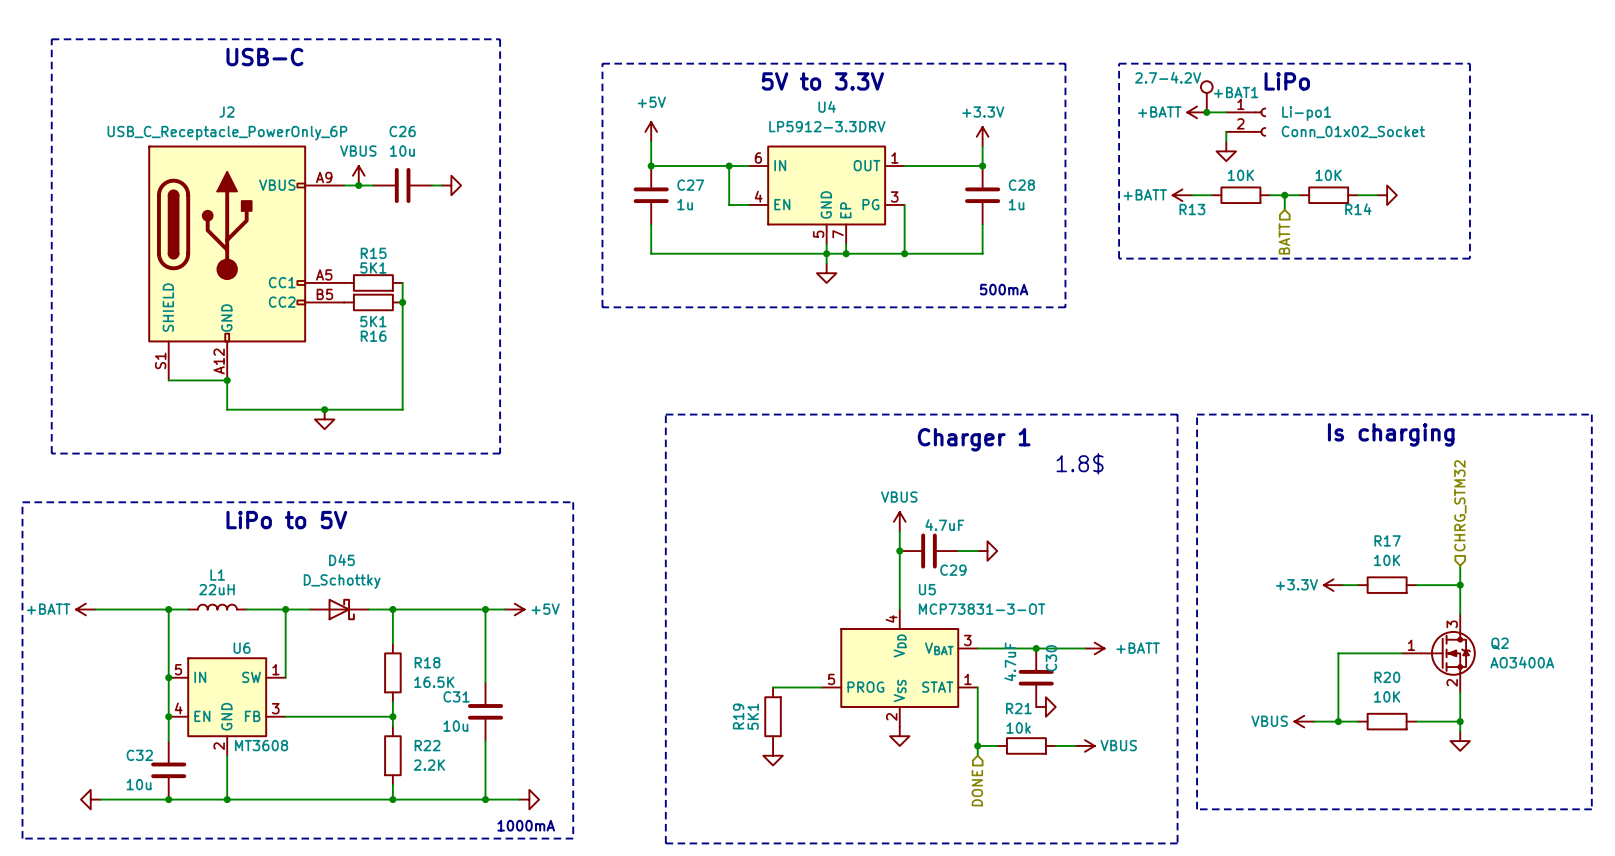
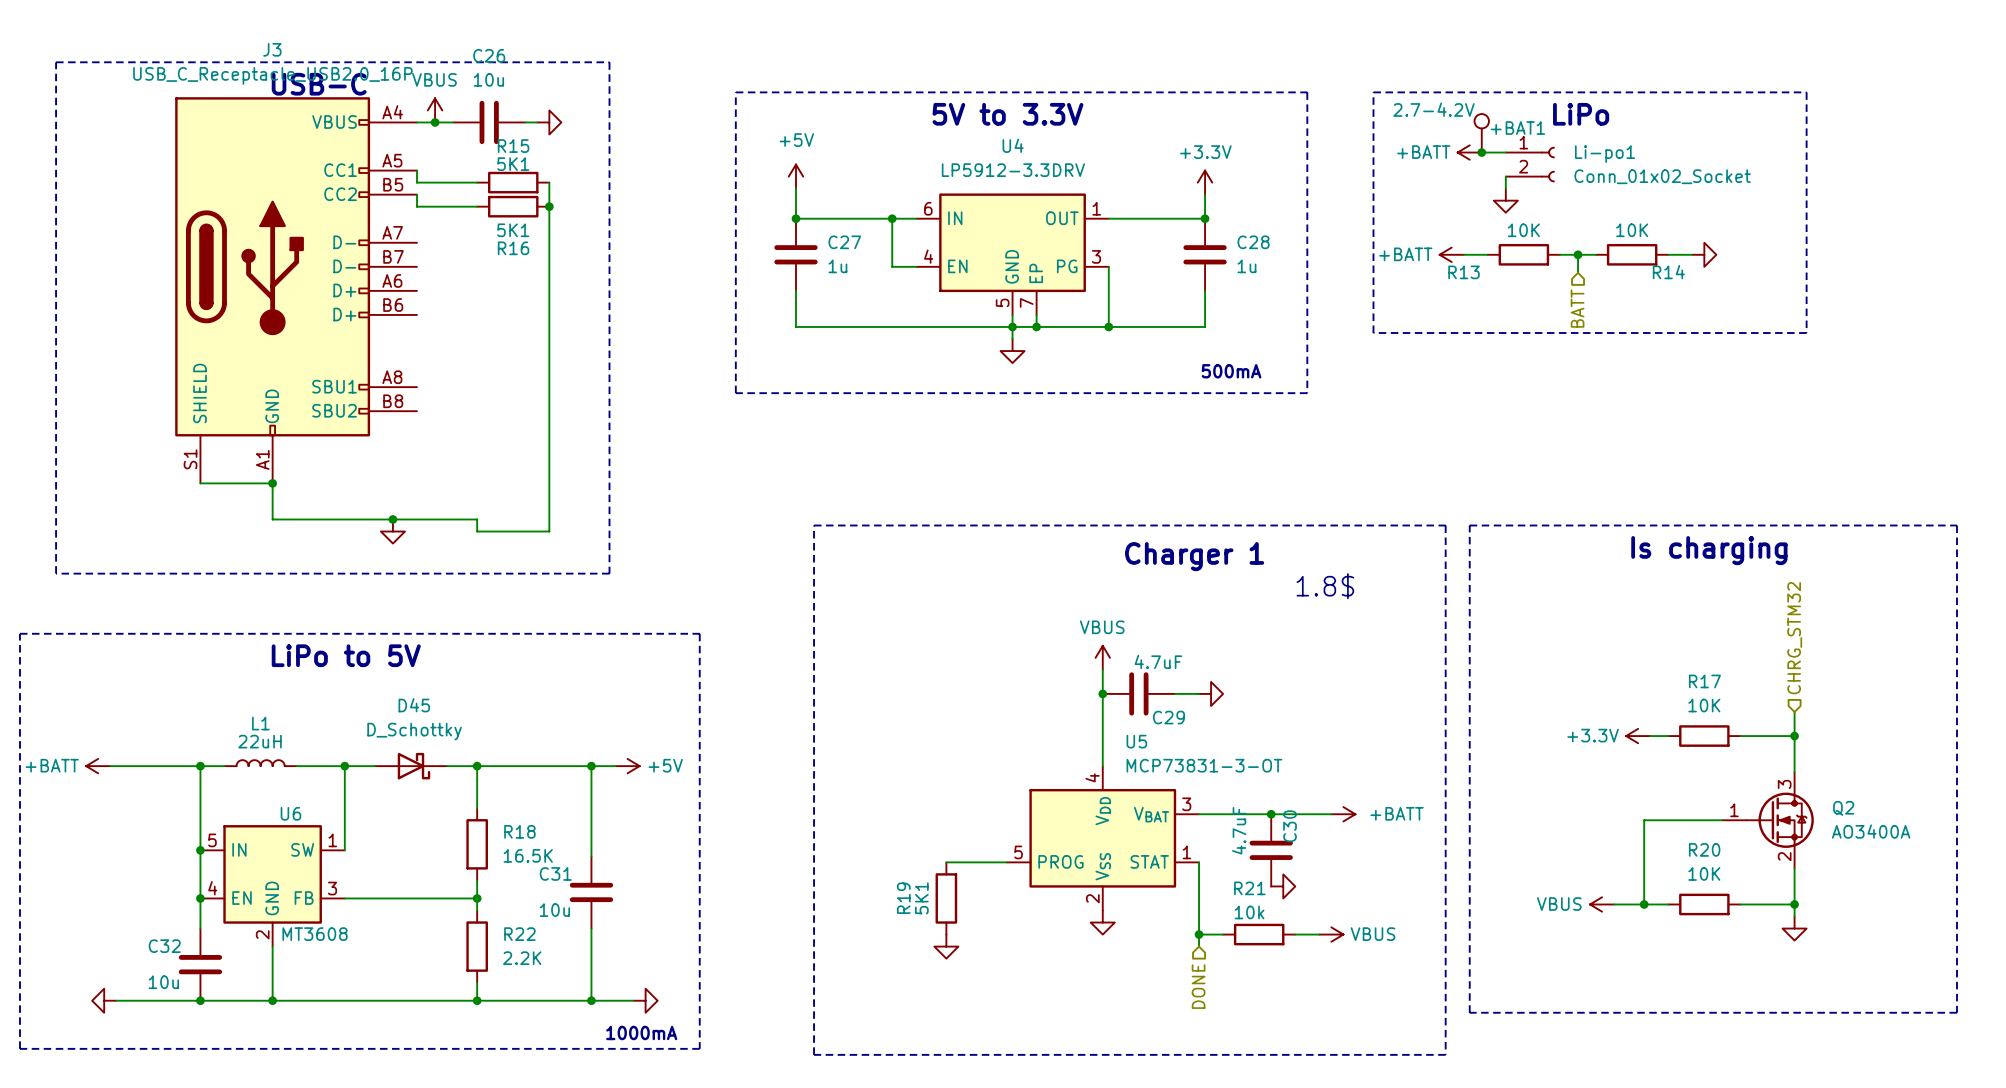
junction: none -> (435, 122)
wire: none -> (417, 170) (417, 182) (477, 182)
wire: none -> (417, 194) (417, 206) (477, 206)
junction: none -> (549, 206)
power symbol position: VBUS (358, 175) -> VBUS (435, 110)
wire: (344, 185) (373, 185) -> (417, 122) (453, 122)
junction: (358, 185) -> none
C26 position: (402, 185) -> (489, 122)
wire: (431, 185) (441, 185) -> (525, 122) (537, 122)
power symbol position: (451, 185) -> (549, 122)
J3: none -> USB_C_Receptacle_USB2.0_16P (296, 290)
J2: USB_C_Receptacle_PowerOnly_6P (246, 262) -> none
R15 position: (373, 282) -> (513, 182)
wire: (402, 282) (402, 409) (392, 409) -> (549, 182) (549, 531) (477, 531) (477, 519)
R16 position: (373, 302) -> (513, 206)
junction: (402, 302) -> none

